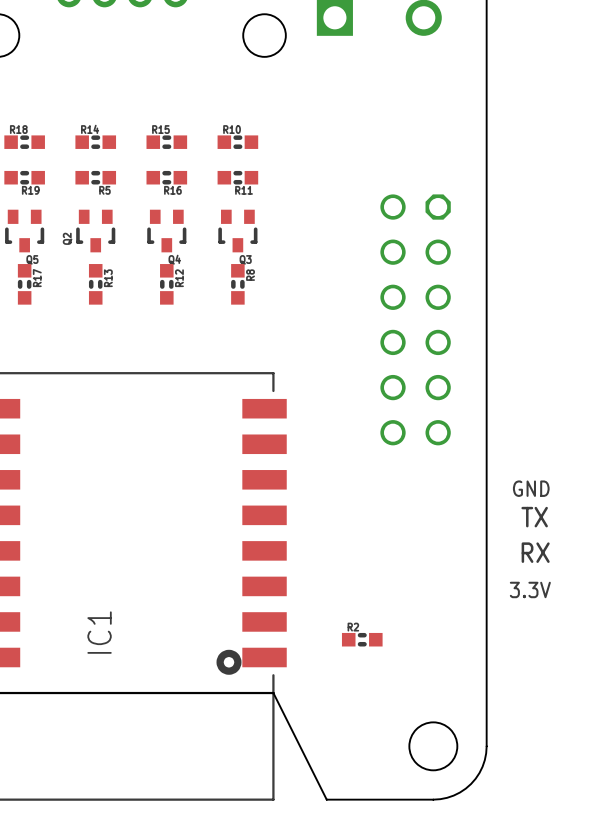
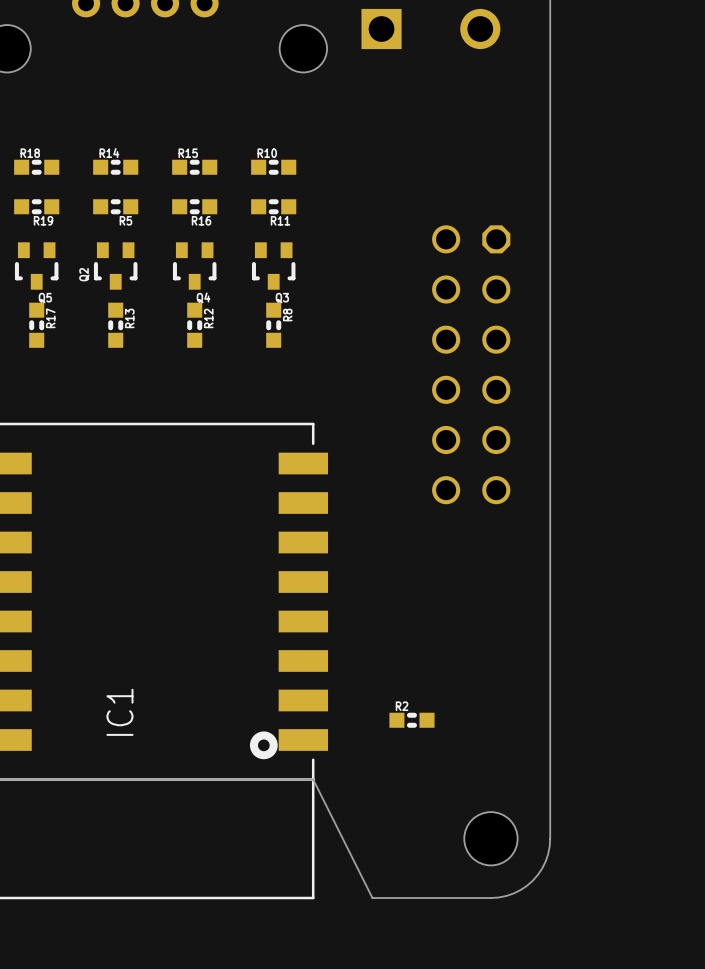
text: GND (531, 488) -> none
text: TX (534, 517) -> none
text: RX (535, 552) -> none
text: 3.3V (530, 589) -> none

